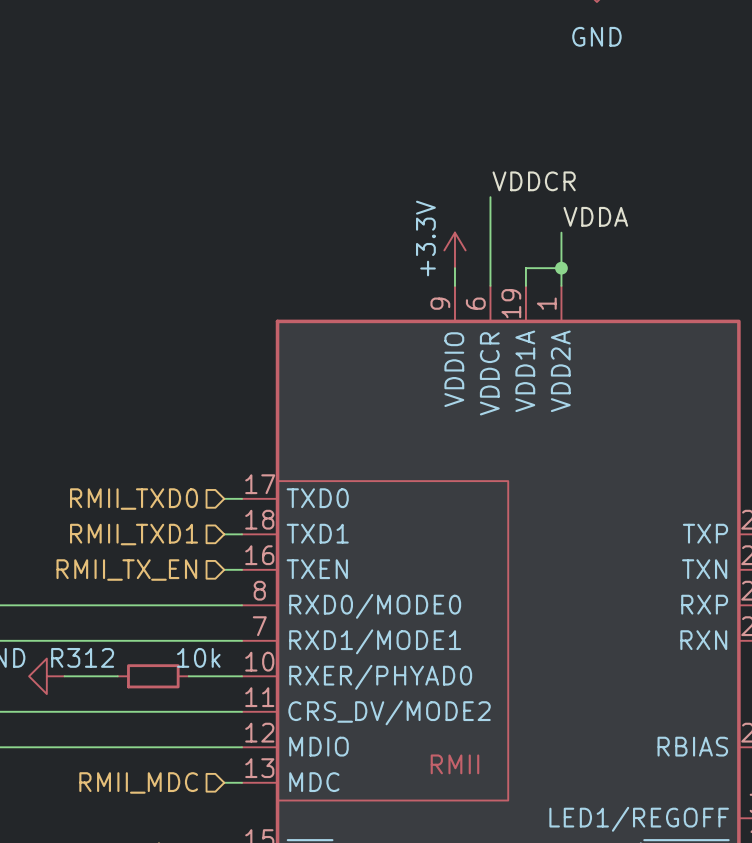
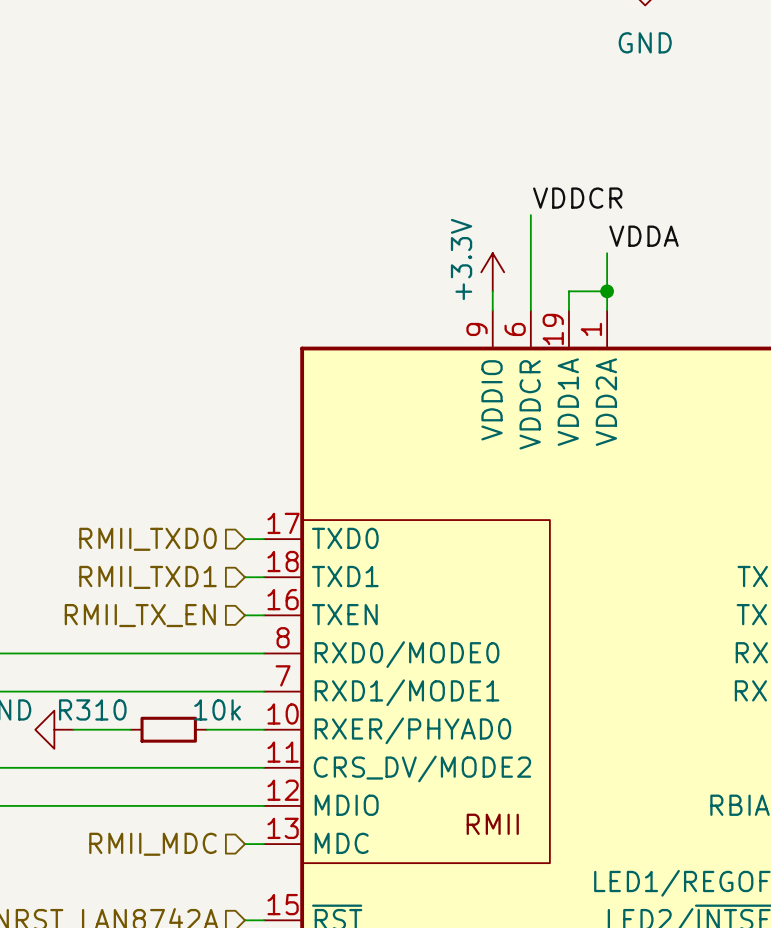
R312 name: R312 (82, 657) -> R310 (92, 709)

